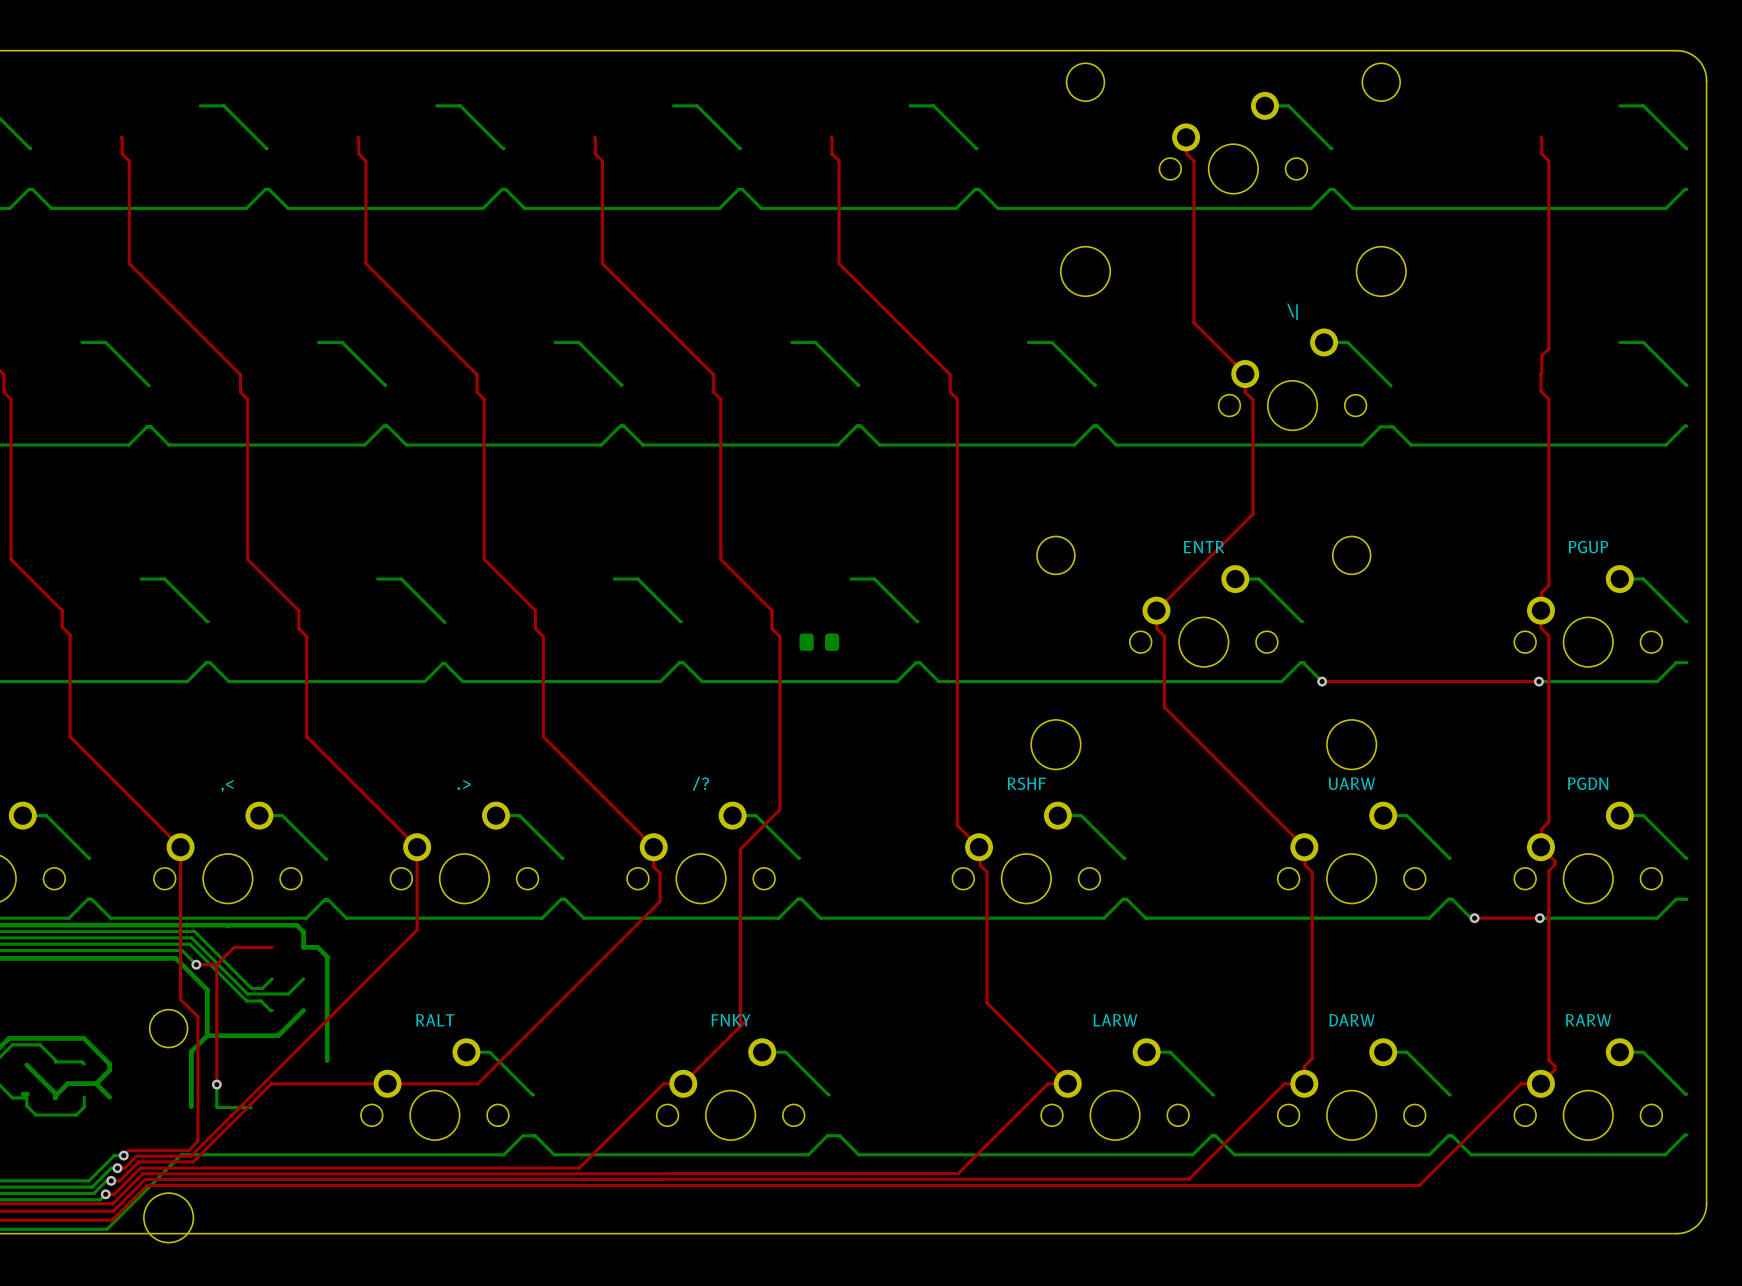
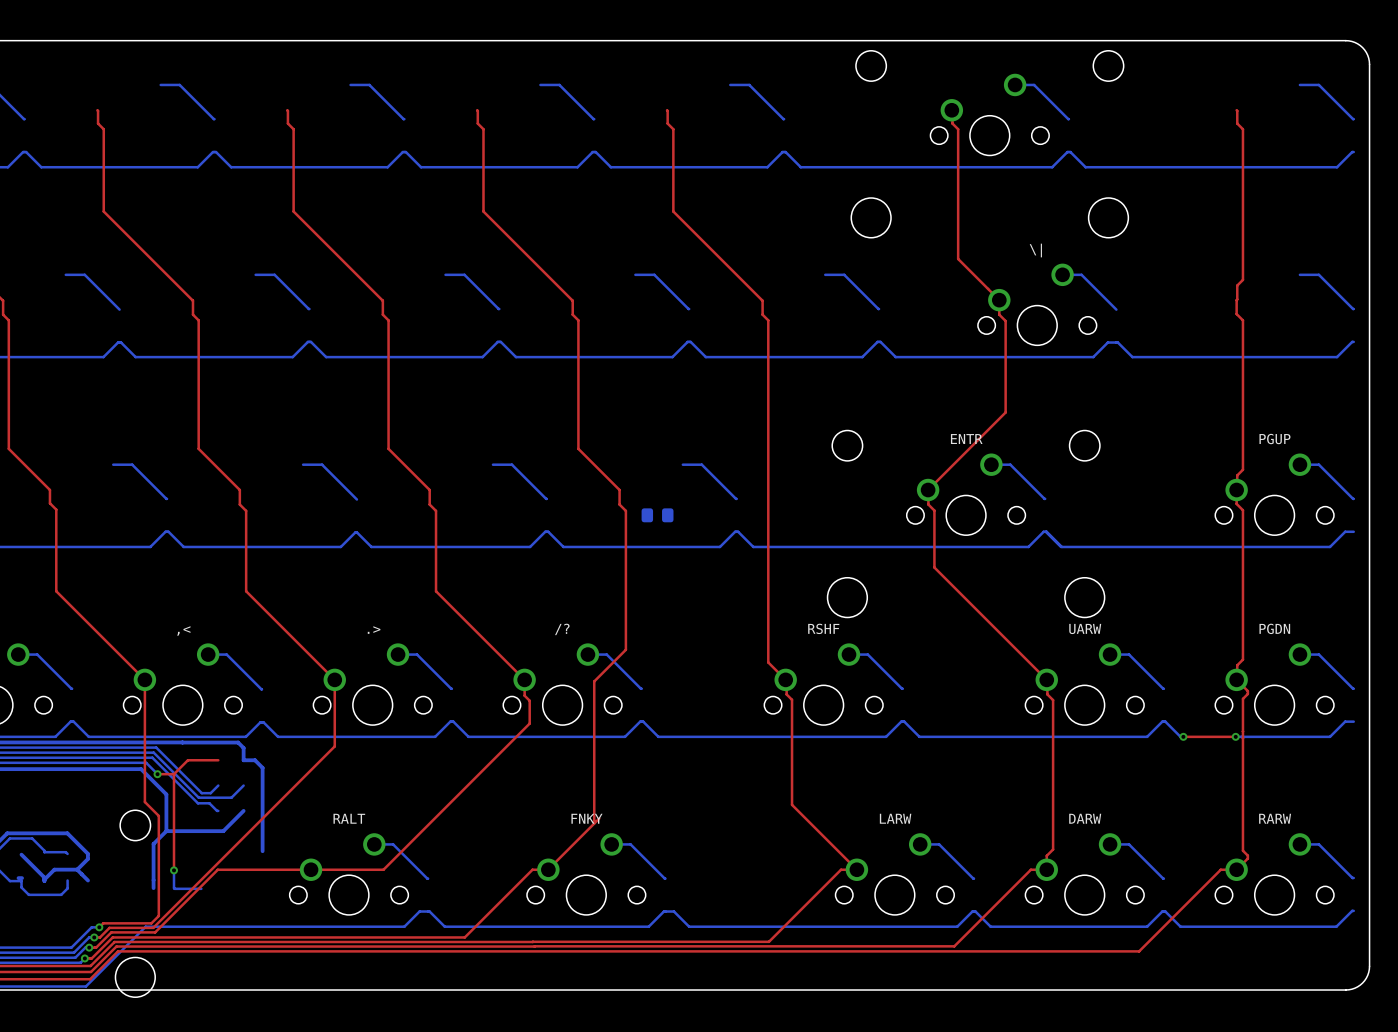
bottom track: none -> (1046, 531) (1061, 546) (1235, 546)
top track: (1322, 681) (1538, 681) -> none
via: (1322, 681) -> none
via: (1538, 681) -> none

